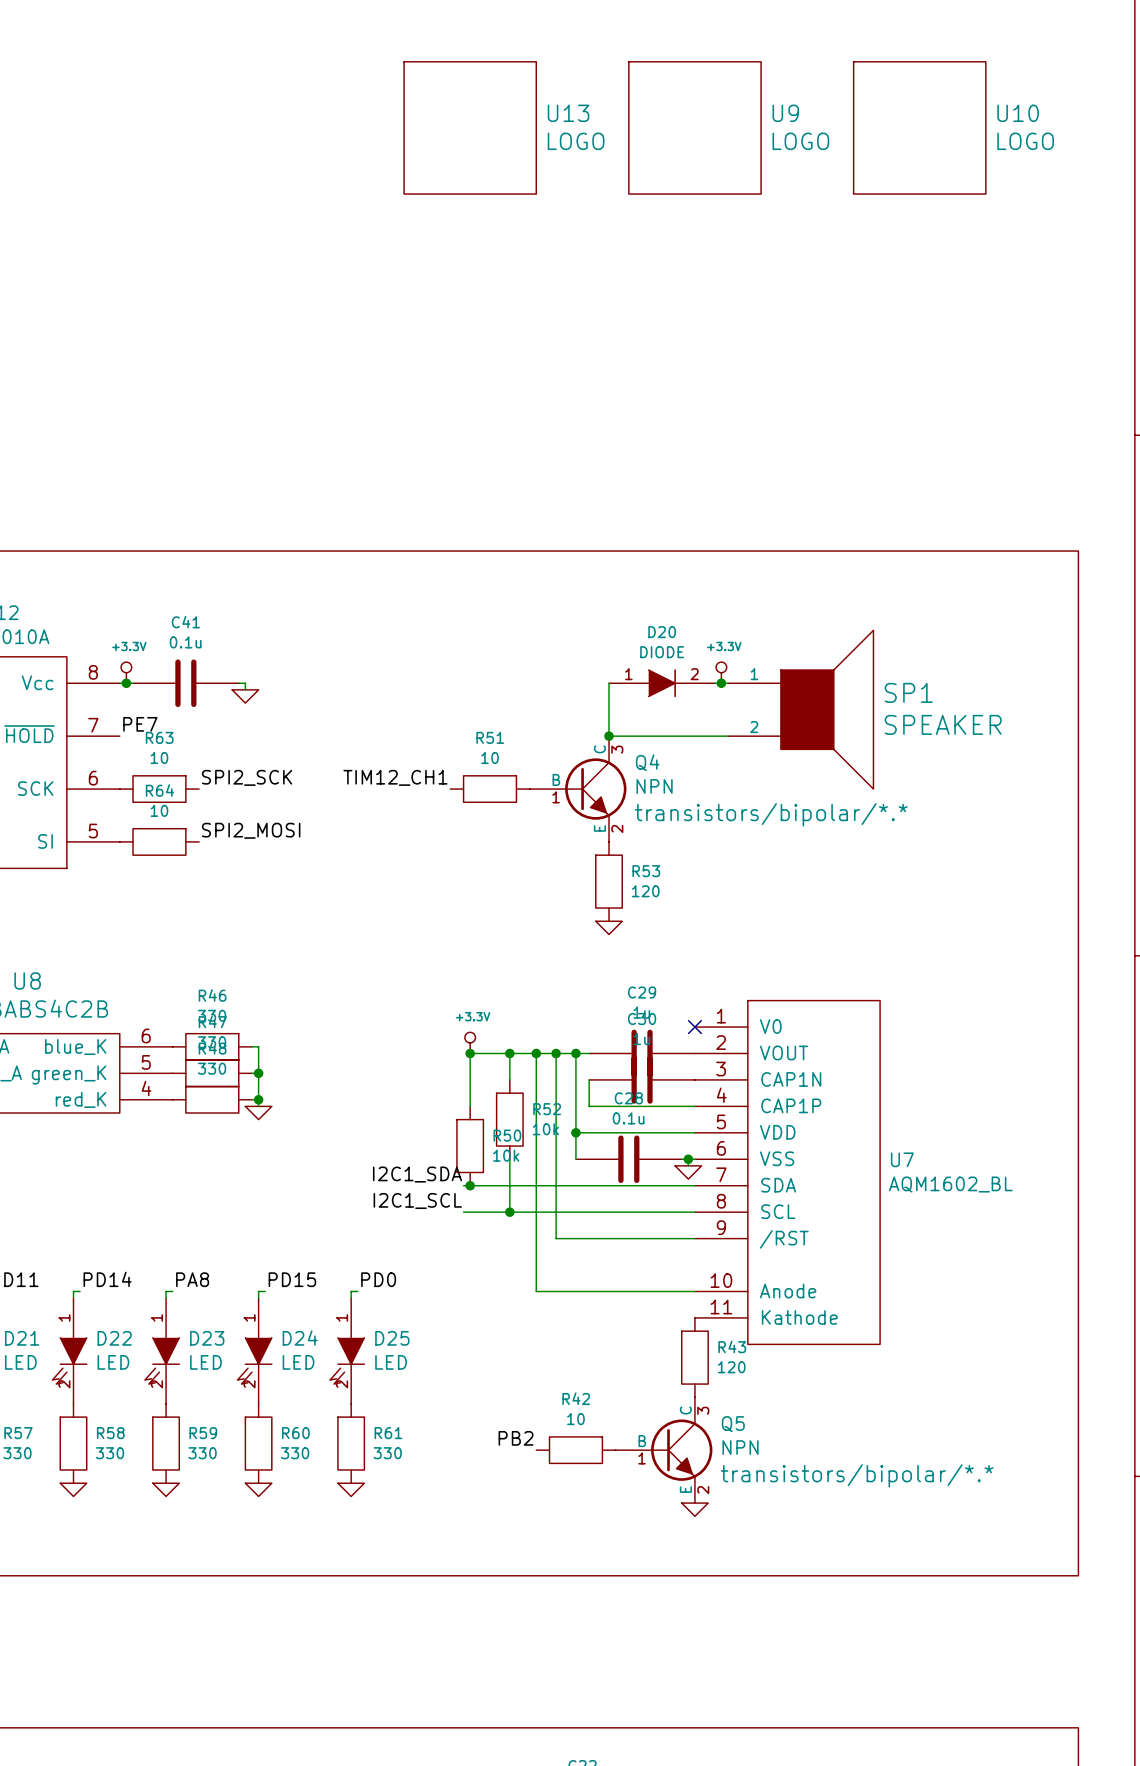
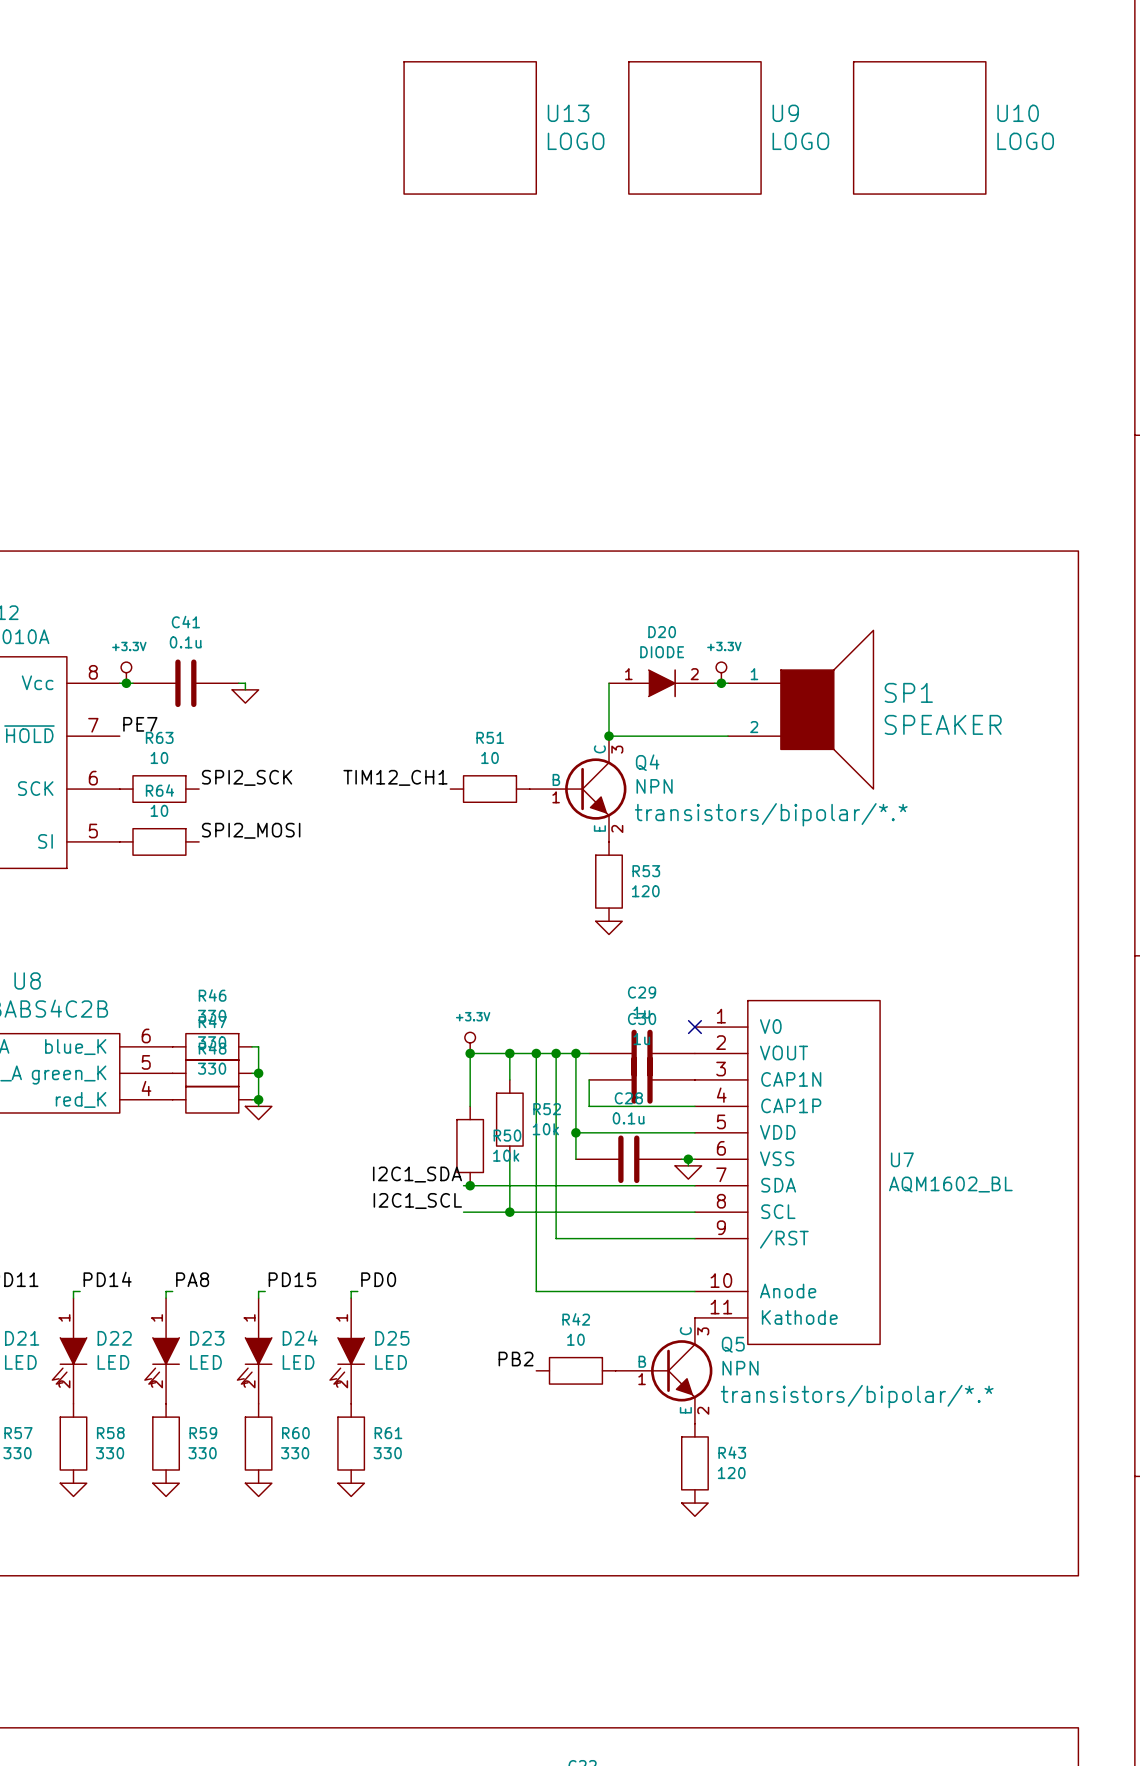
R43 position: (694, 1357) -> (694, 1463)
label position: PB2 (516, 1438) -> PB2 (516, 1359)
R42 position: (575, 1450) -> (575, 1370)
Q5 position: (664, 1450) -> (664, 1370)

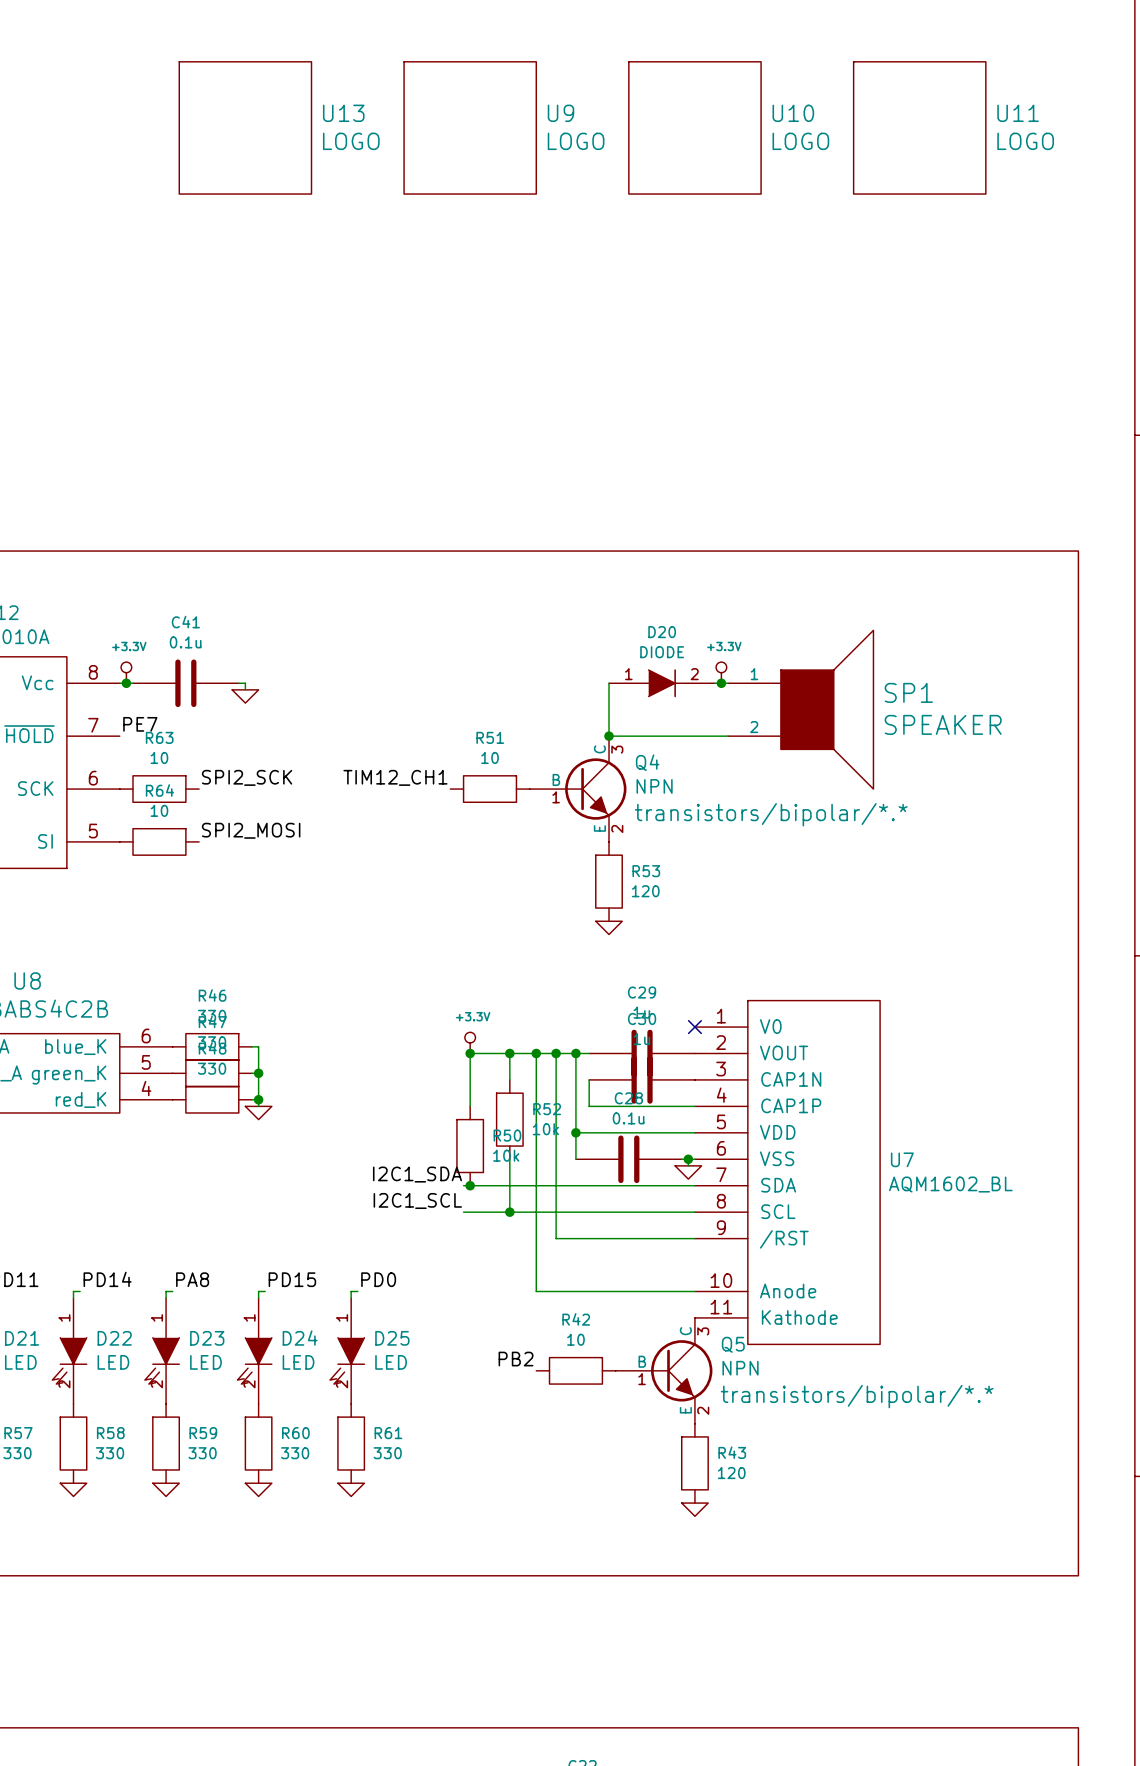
U13 name: U13 (568, 113) -> U9 (560, 113)
U9 name: U9 (785, 113) -> U10 (793, 113)
U10 name: U10 (1018, 113) -> U11 (1018, 113)
U13: none -> LOGO (245, 127)

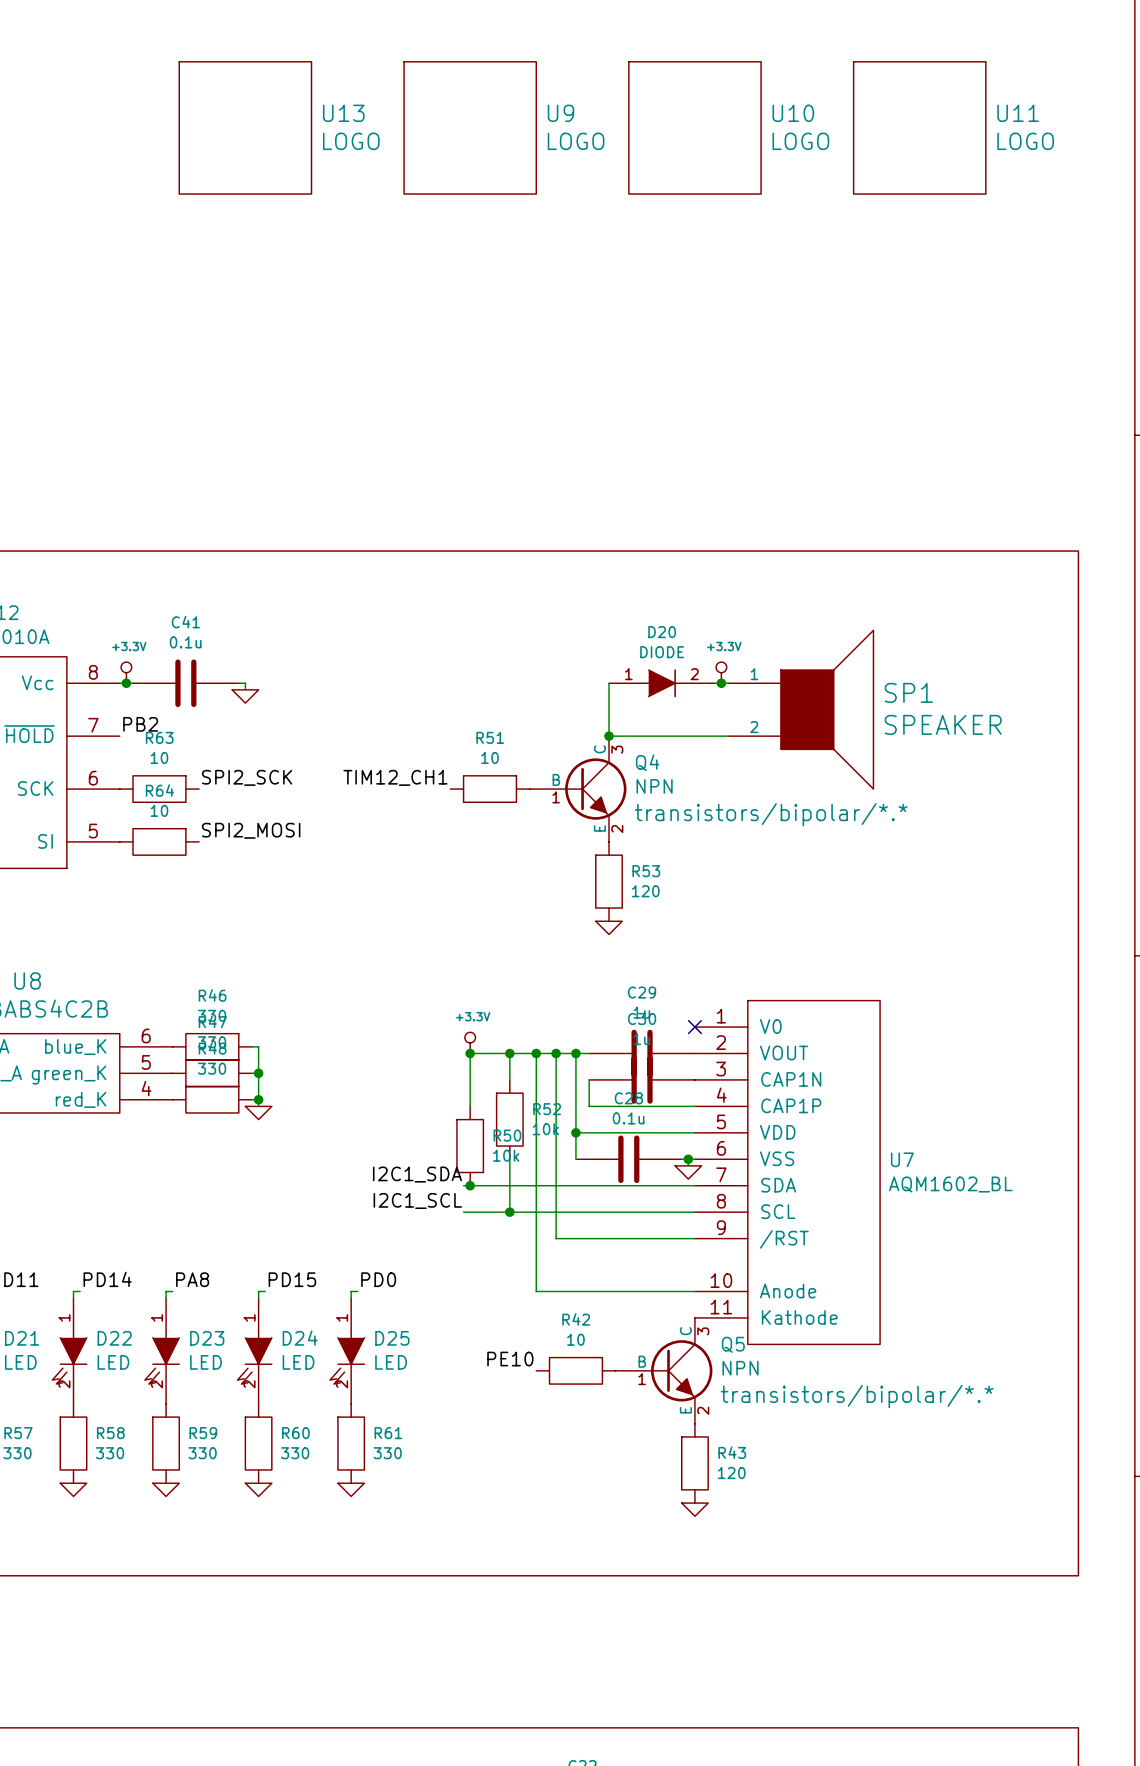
label: PE7 (140, 724) -> PB2 (140, 724)
label: PB2 (516, 1359) -> PE10 (510, 1359)

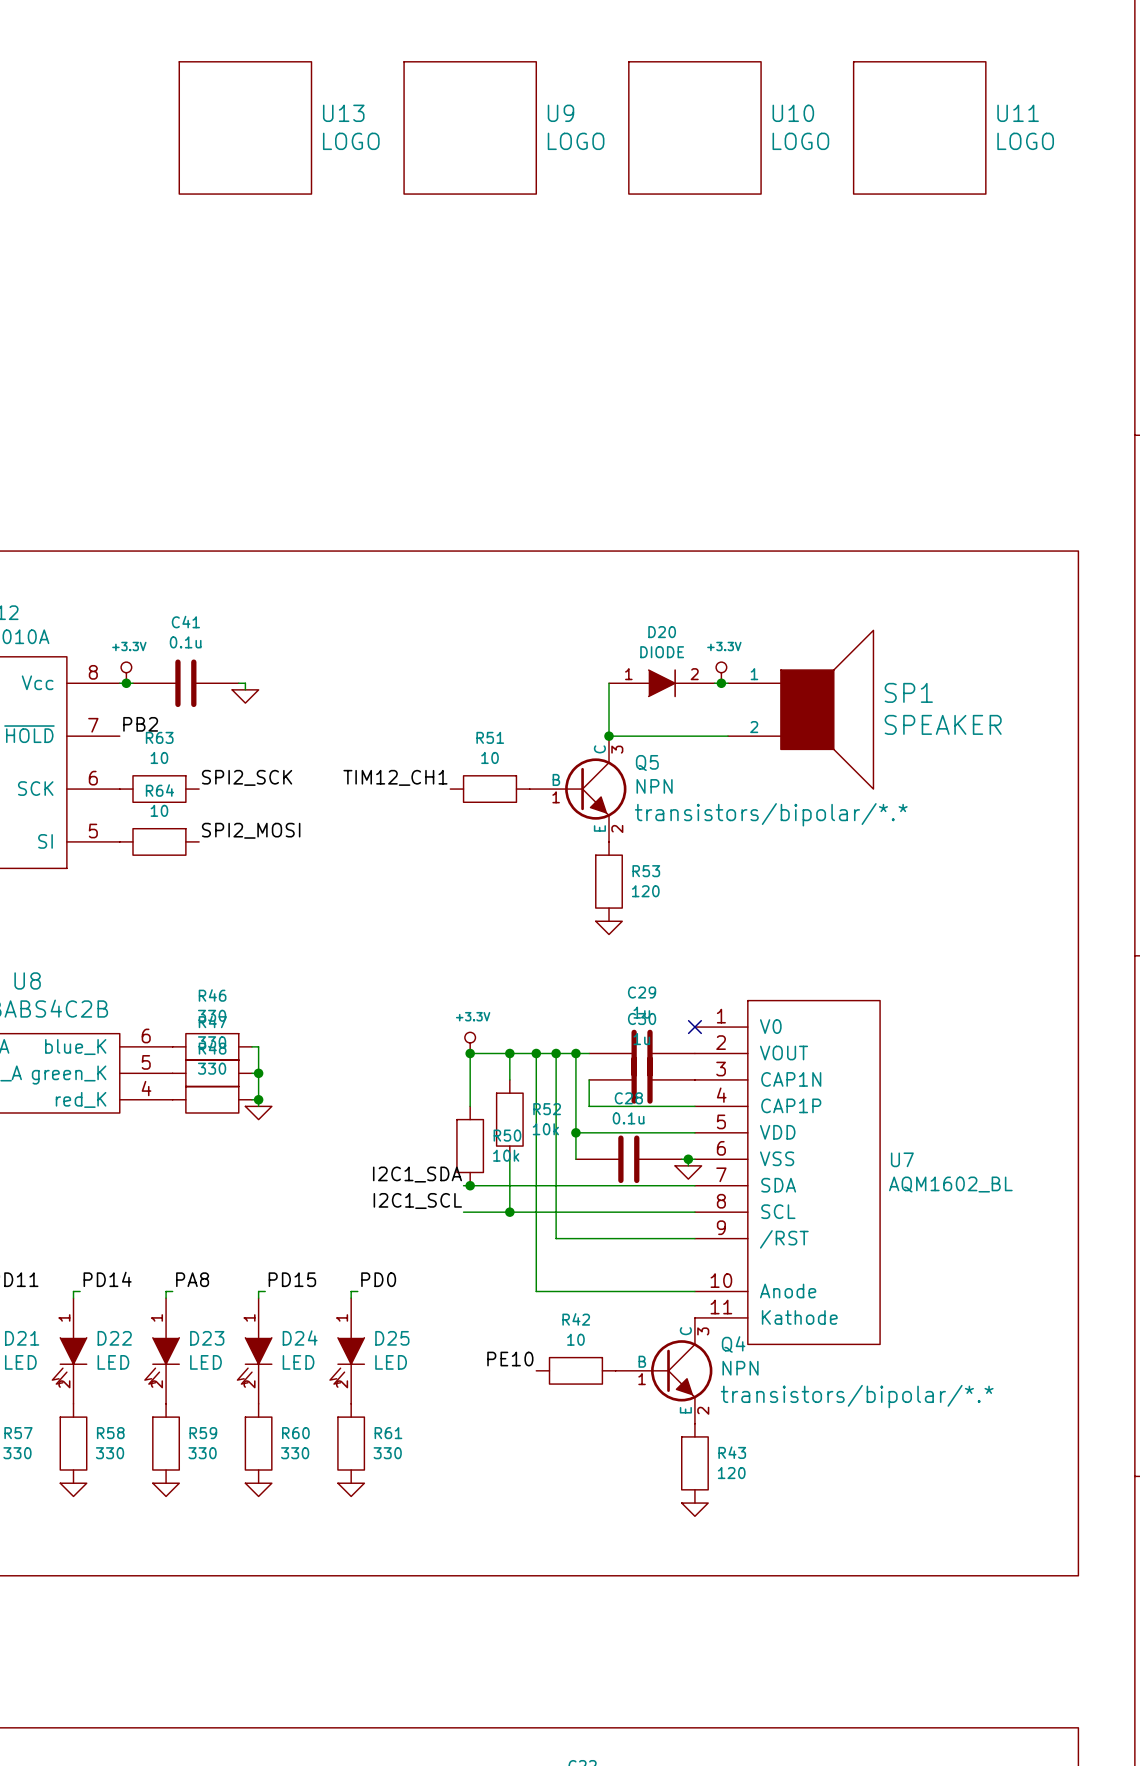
Q4 name: Q4 (647, 762) -> Q5 (647, 763)
Q5 name: Q5 (733, 1344) -> Q4 (733, 1344)

